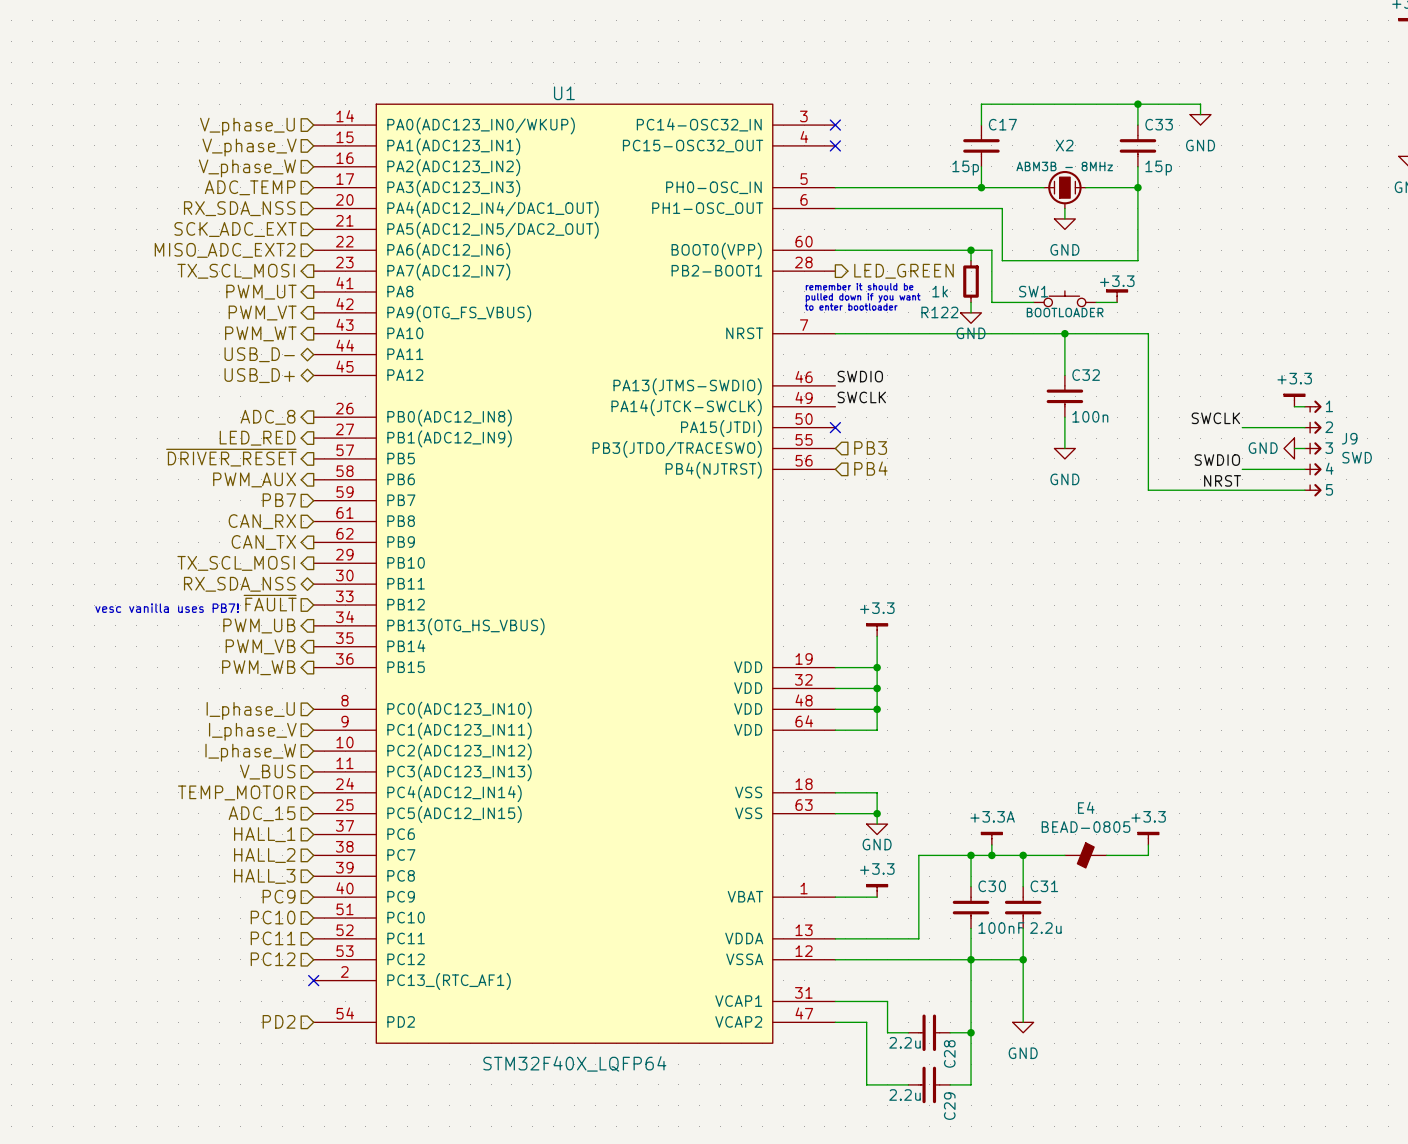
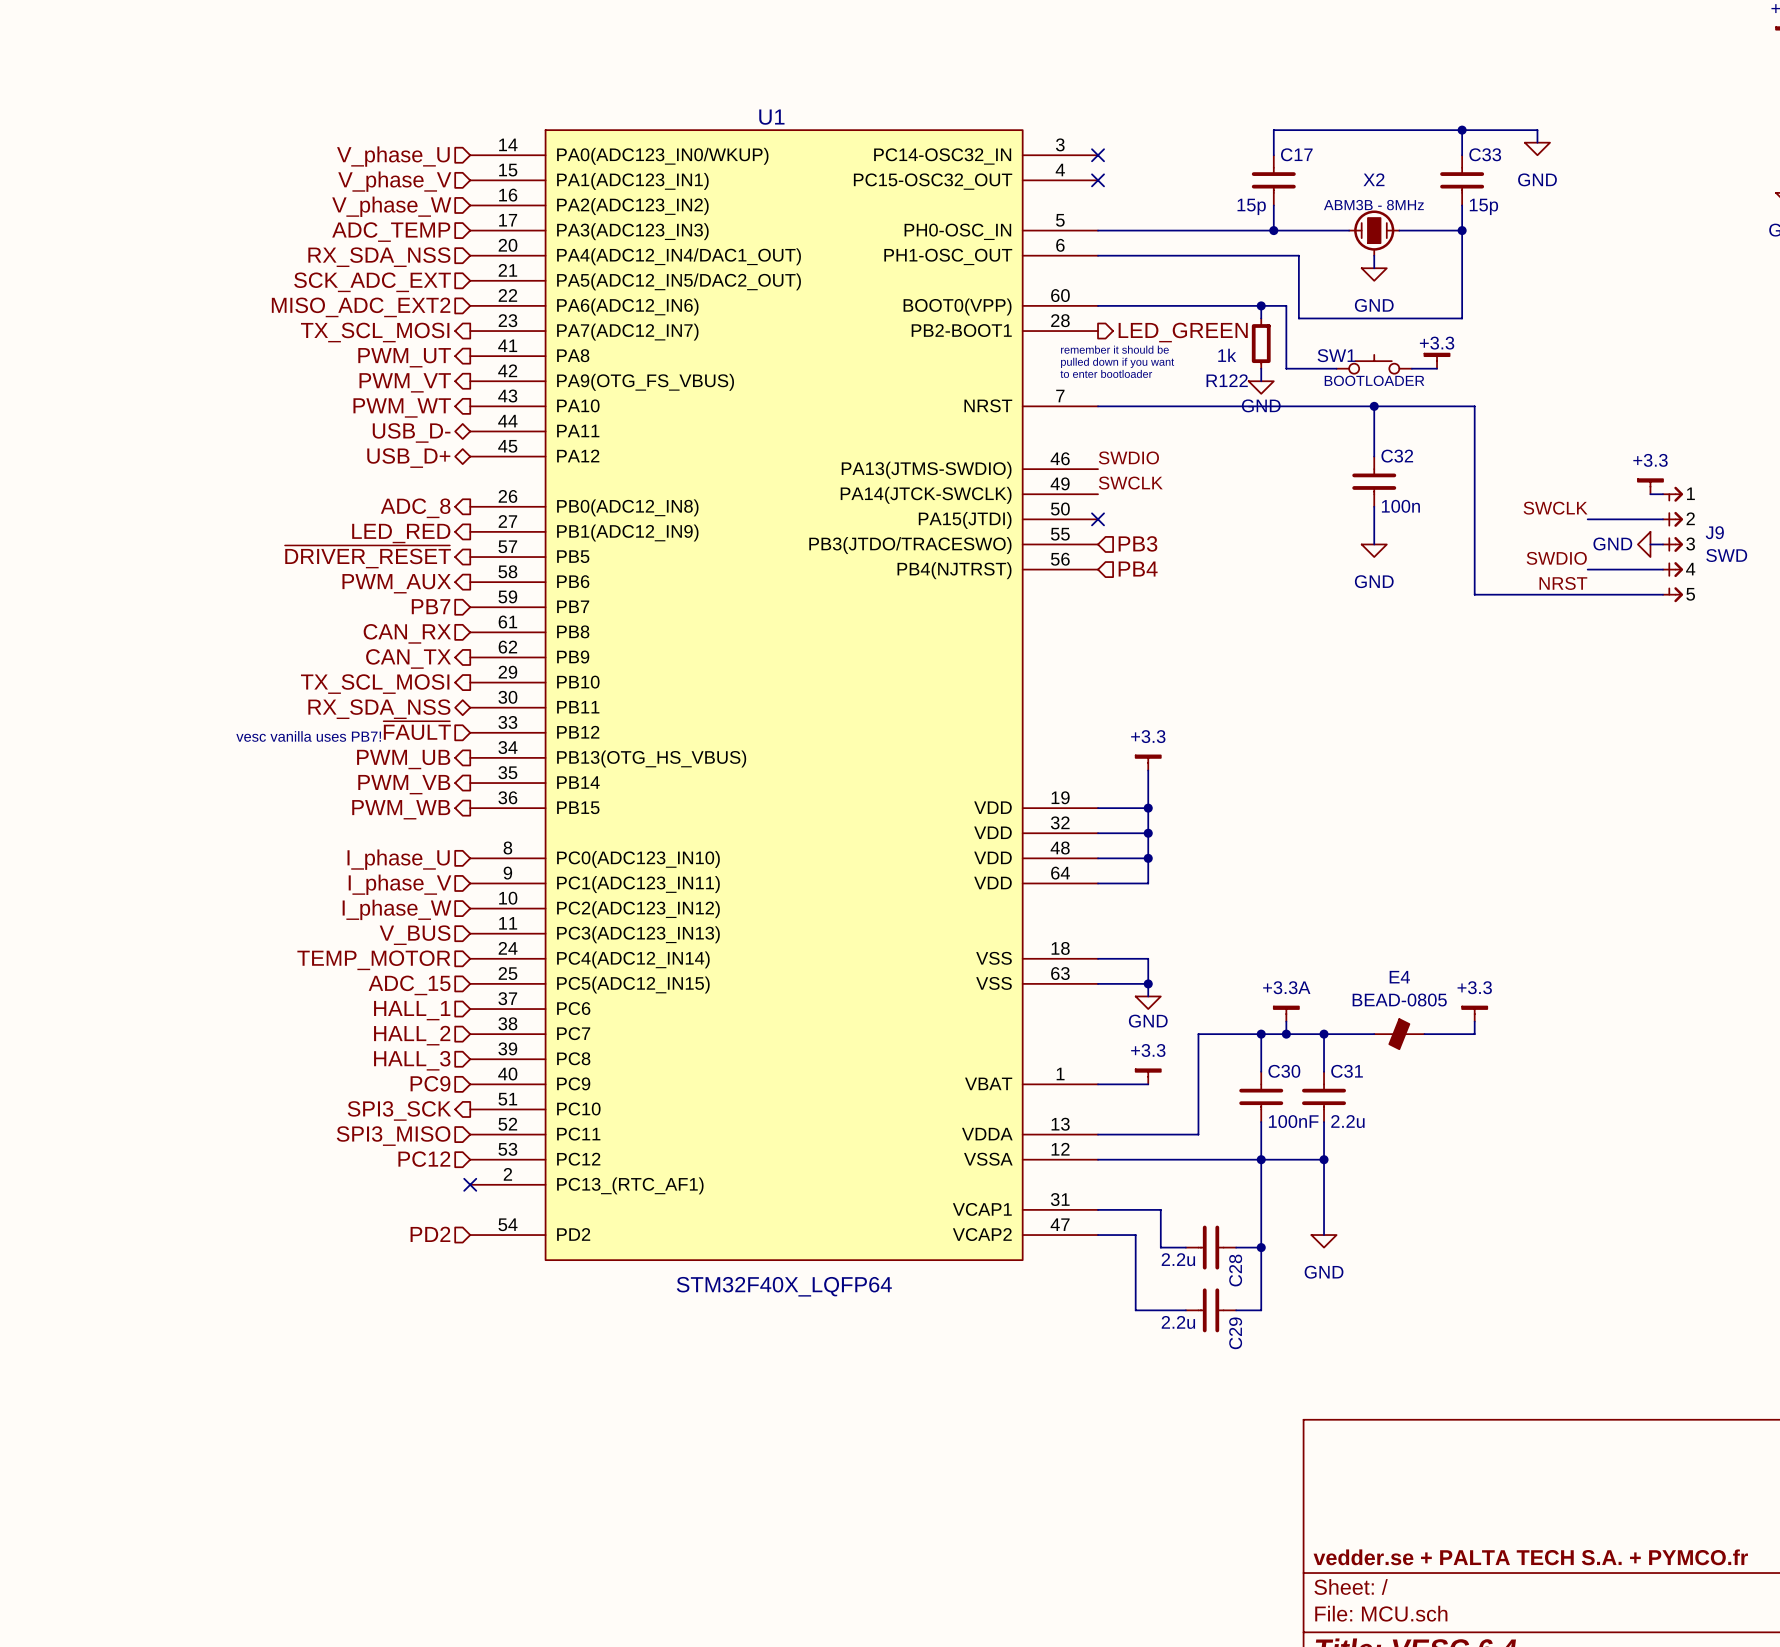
hierarchical label shape: input (273, 917) -> output (399, 1110)
hierarchical label: PC10 (273, 917) -> SPI3_SCK (399, 1110)
hierarchical label: PC11 (273, 938) -> SPI3_MISO (393, 1136)

